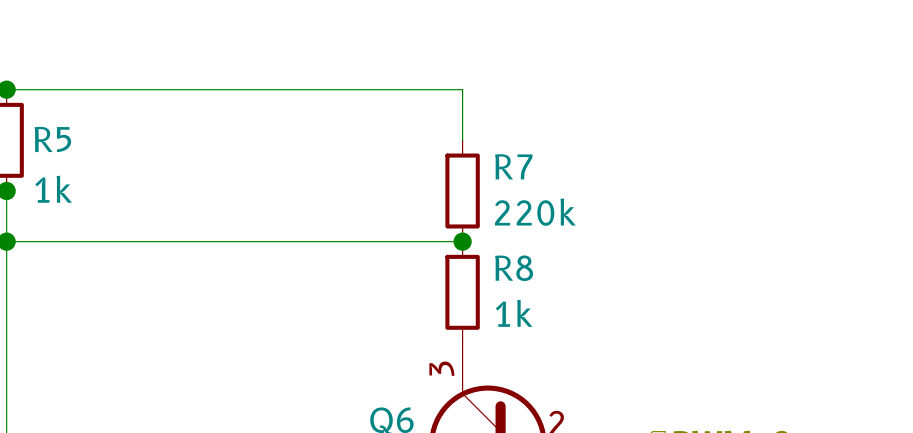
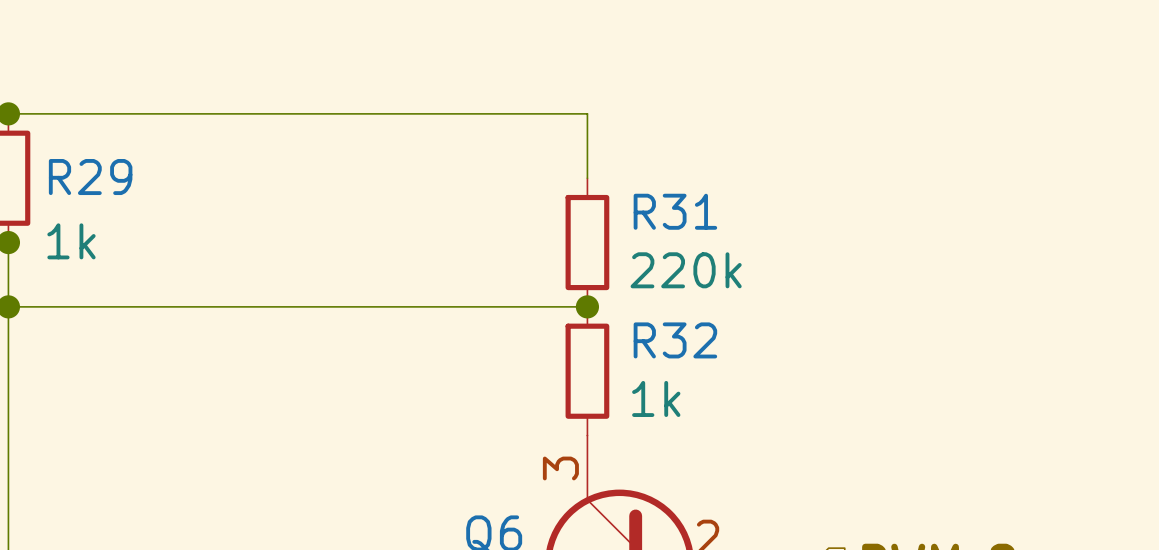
R5 name: R5 (52, 139) -> R29 (90, 177)
R7 name: R7 (513, 166) -> R31 (675, 211)
R8 name: R8 (514, 268) -> R32 (675, 340)

